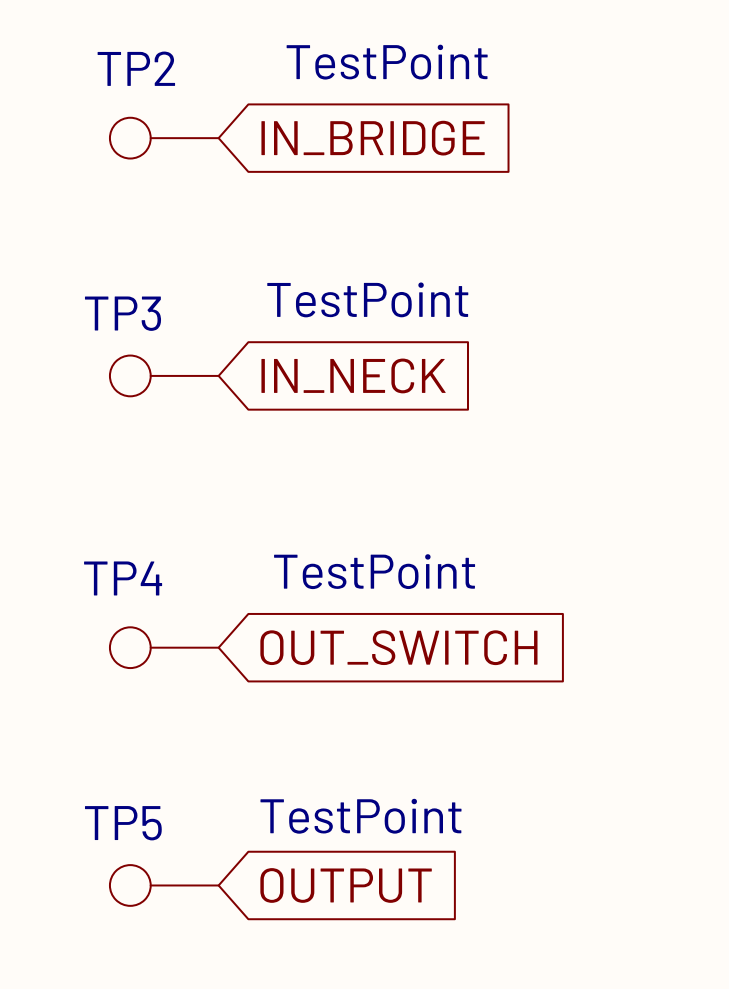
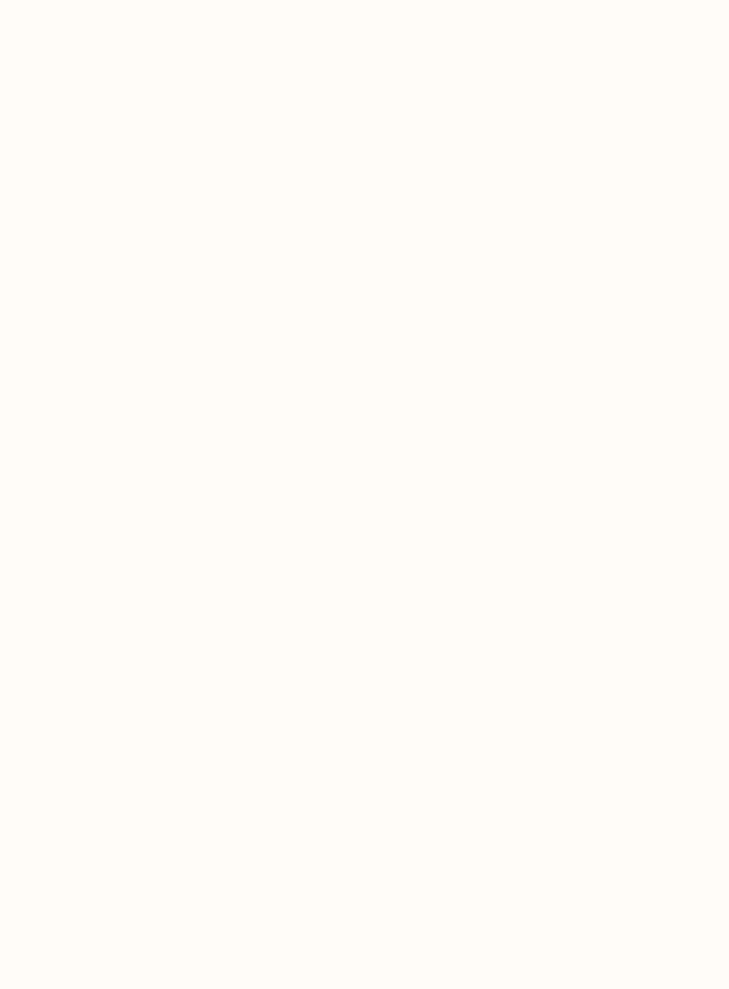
TP2: TestPoint (164, 138) -> none
global label: IN_BRIDGE (373, 138) -> none
TP3: TestPoint (164, 375) -> none
global label: IN_NECK (353, 375) -> none
TP4: TestPoint (164, 647) -> none
global label: OUT_SWITCH (398, 647) -> none
TP5: TestPoint (164, 885) -> none
global label: OUTPUT (346, 885) -> none

